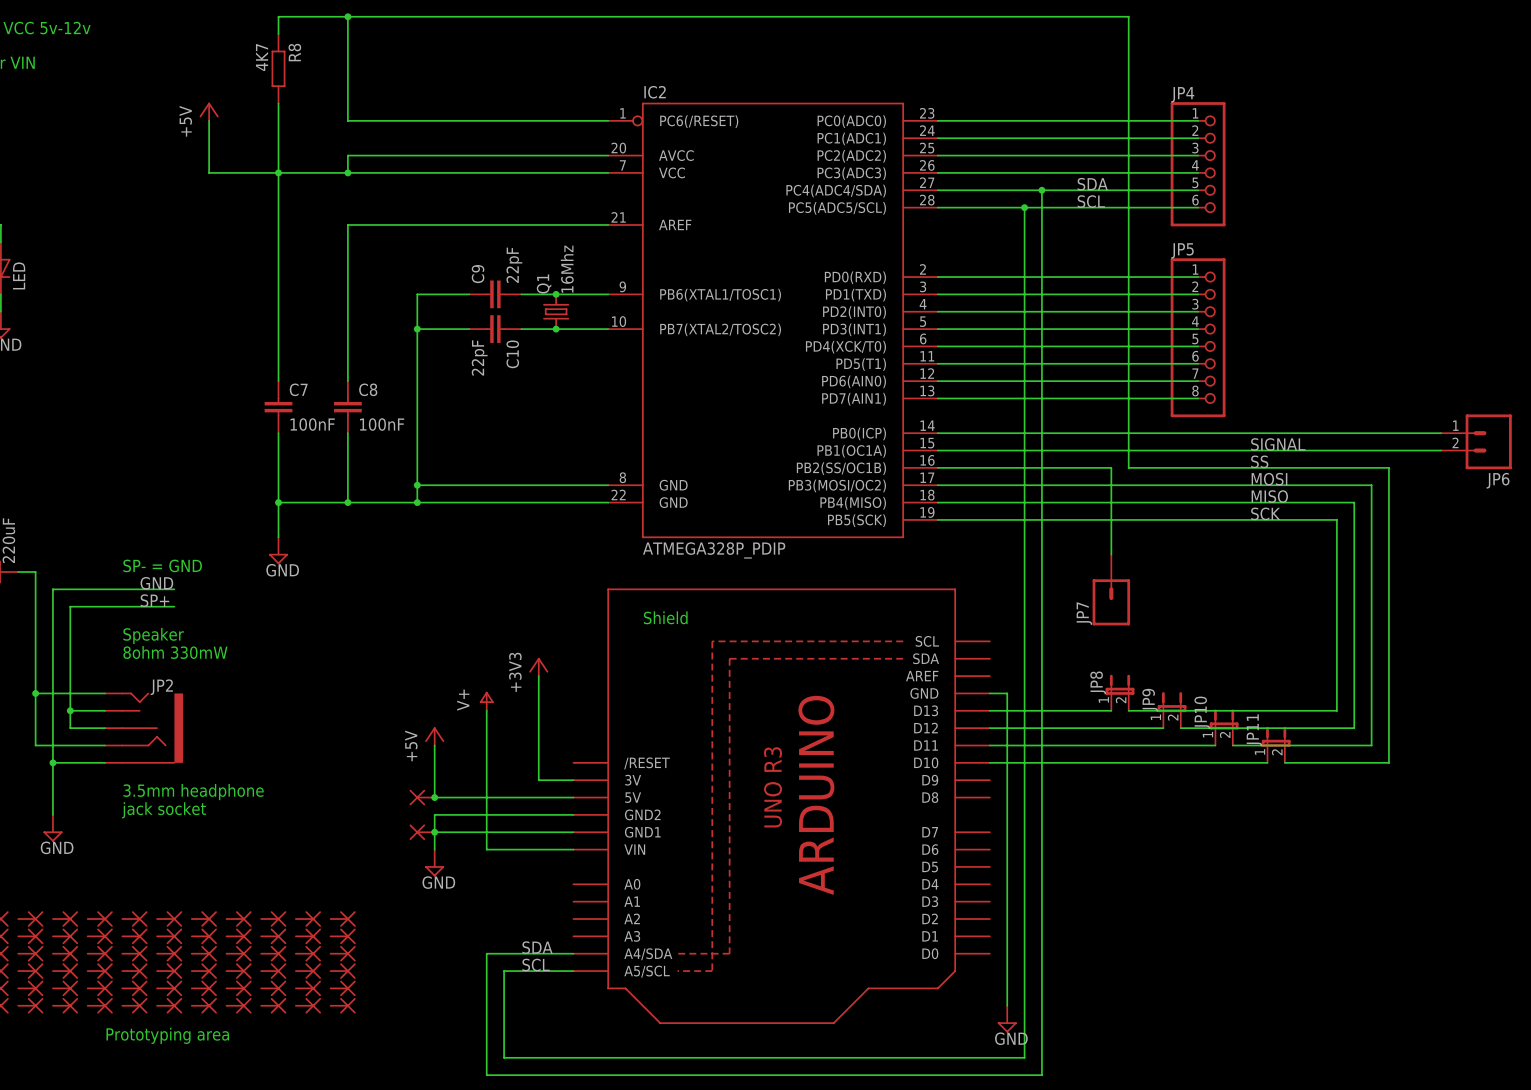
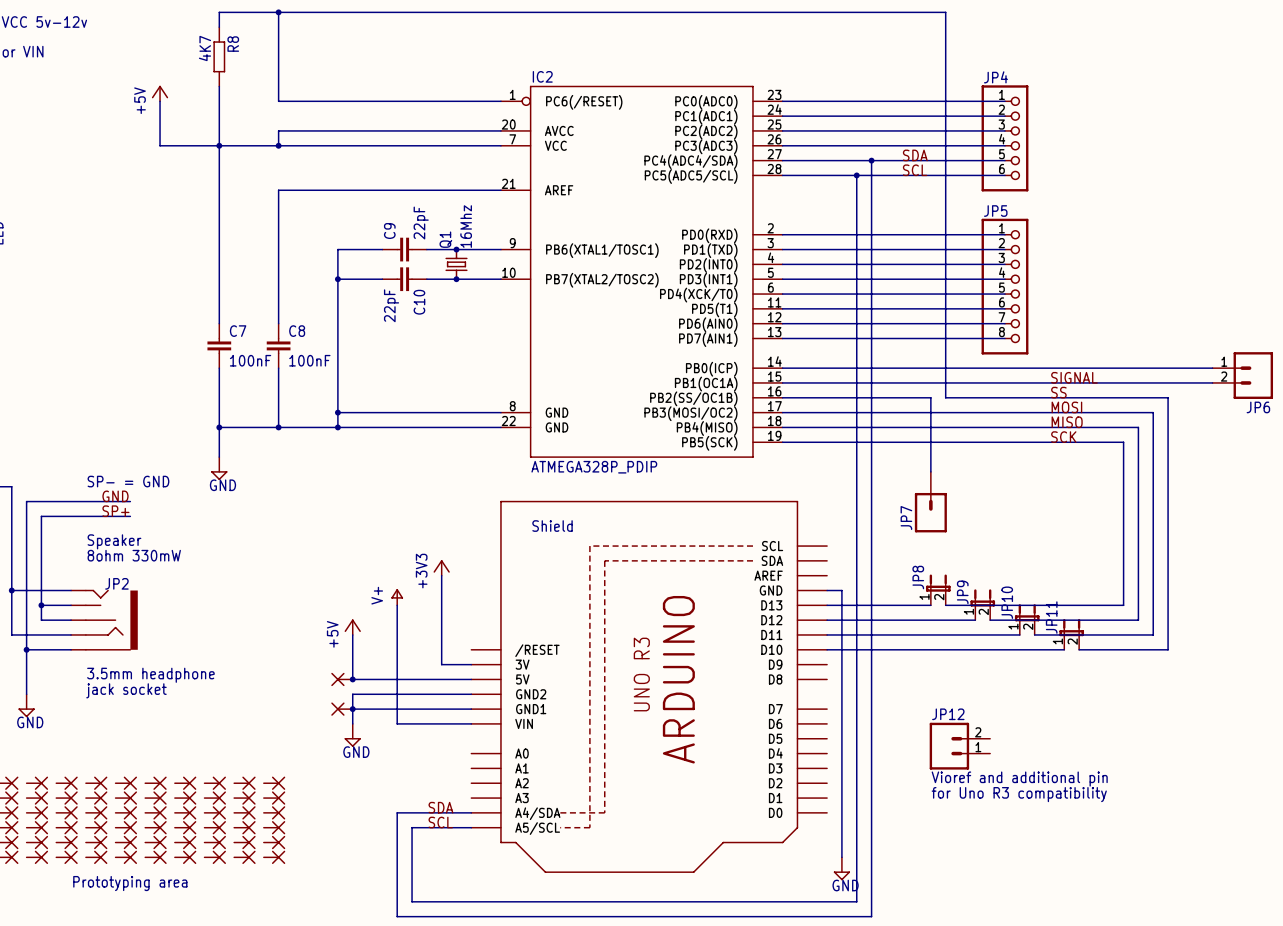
JP12: none -> (959, 746)
text: none -> Vioref and additional pin (1019, 779)
text: none -> for Uno R3 compatibility (1019, 794)

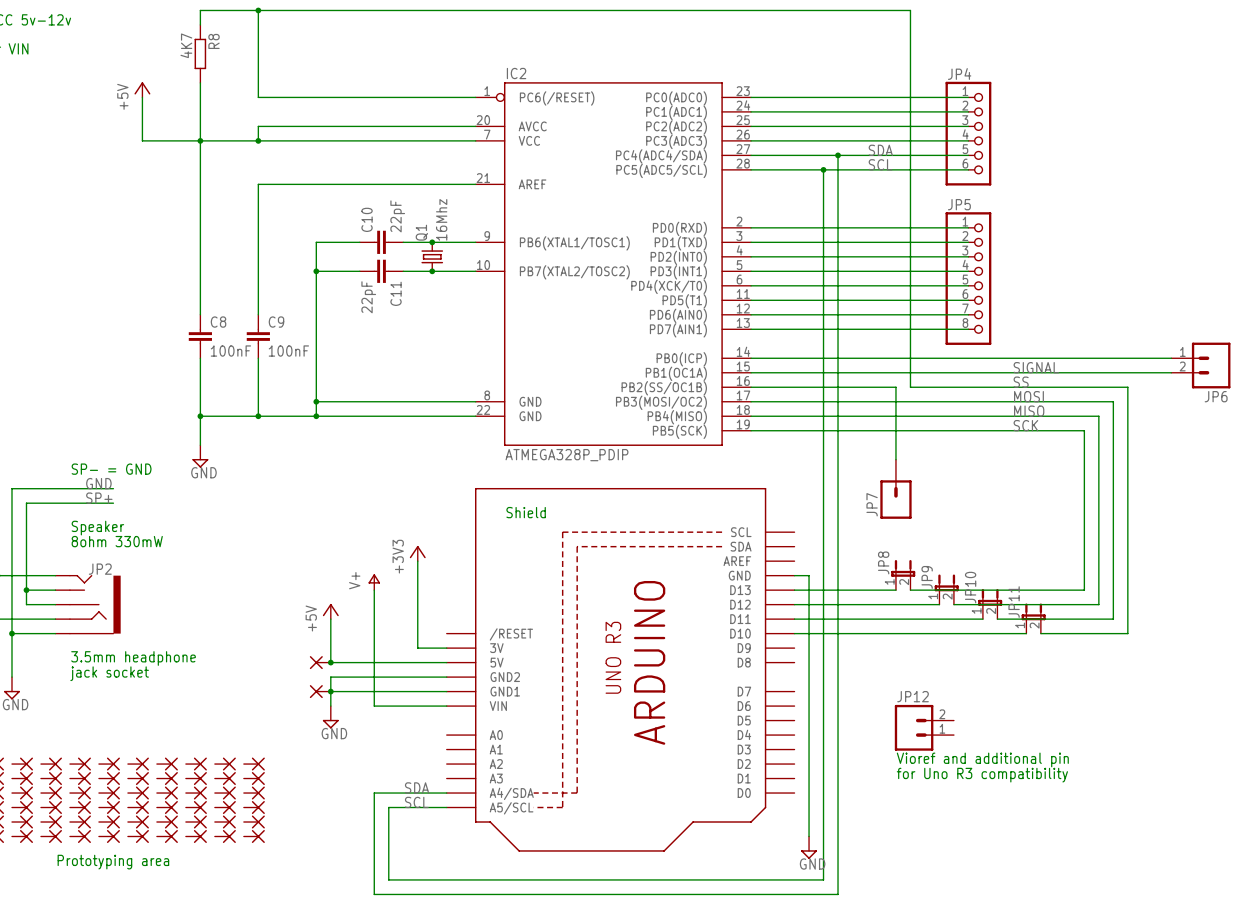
C9 name: C9 (389, 231) -> C10 (367, 219)
C10 name: C10 (419, 302) -> C11 (396, 293)
C7 name: C7 (238, 331) -> C8 (218, 322)
C8 name: C8 (297, 331) -> C9 (276, 322)

